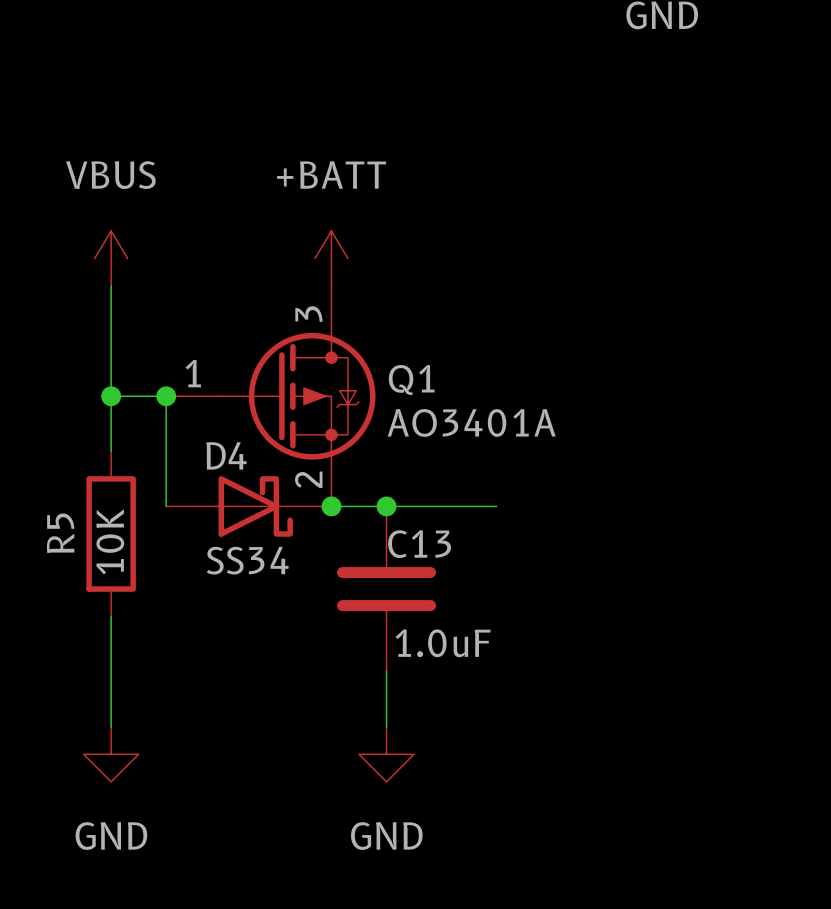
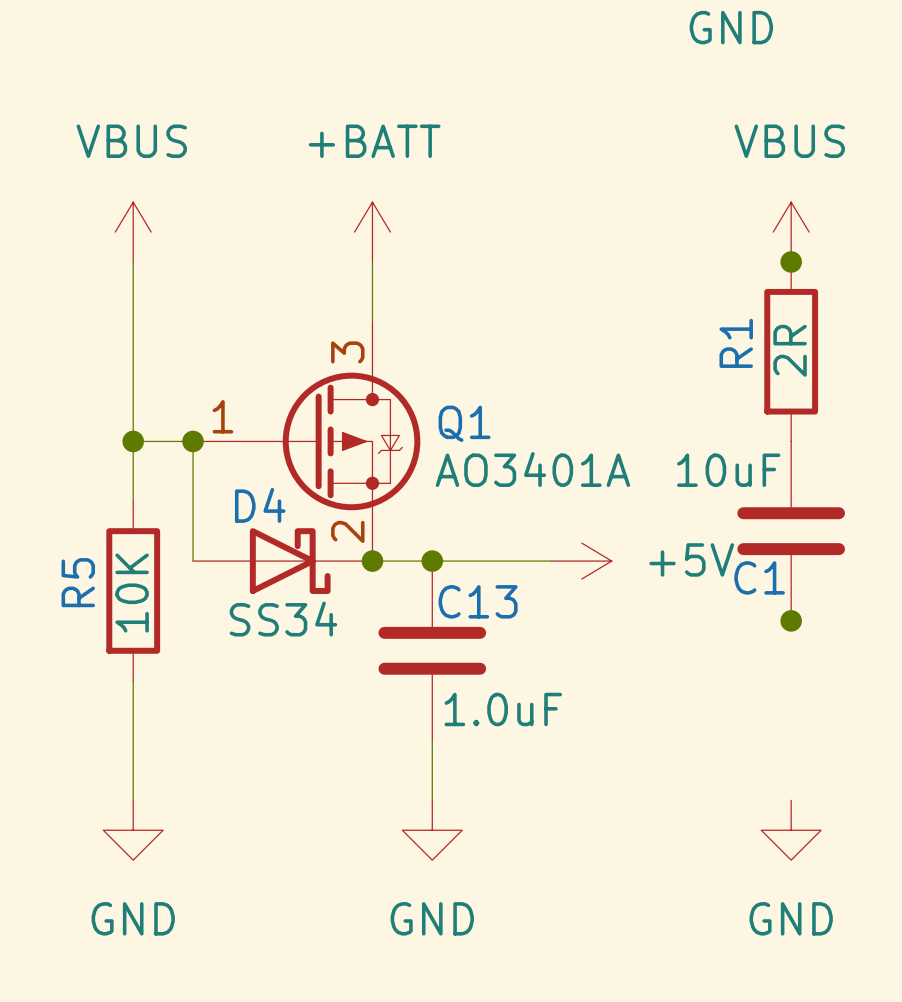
power symbol: none -> VBUS (791, 232)
junction: none -> (791, 262)
power symbol position: VBUS (111, 258) -> VBUS (133, 232)
power symbol position: +BATT (331, 258) -> +BATT (372, 232)
R1: none -> 2R (791, 351)
C1: none -> 10uF (791, 531)
power symbol: none -> +5V (581, 561)
junction: none -> (791, 620)
power symbol: none -> GND (791, 830)

